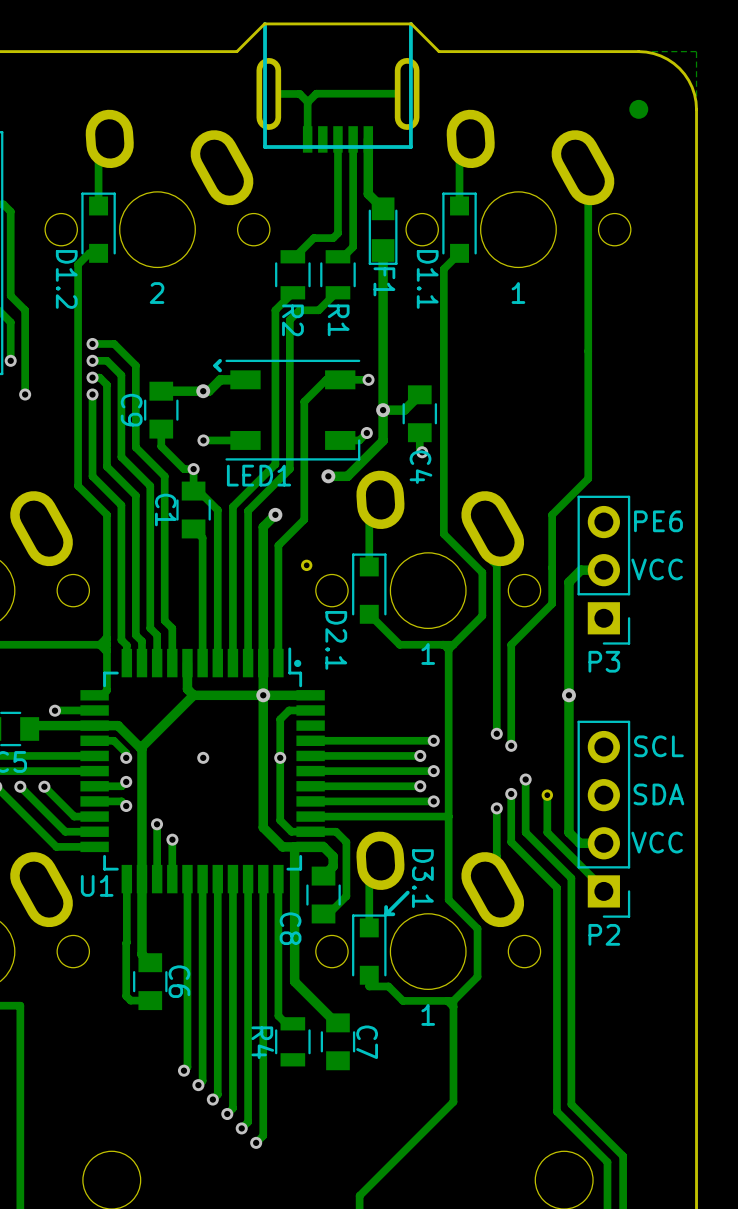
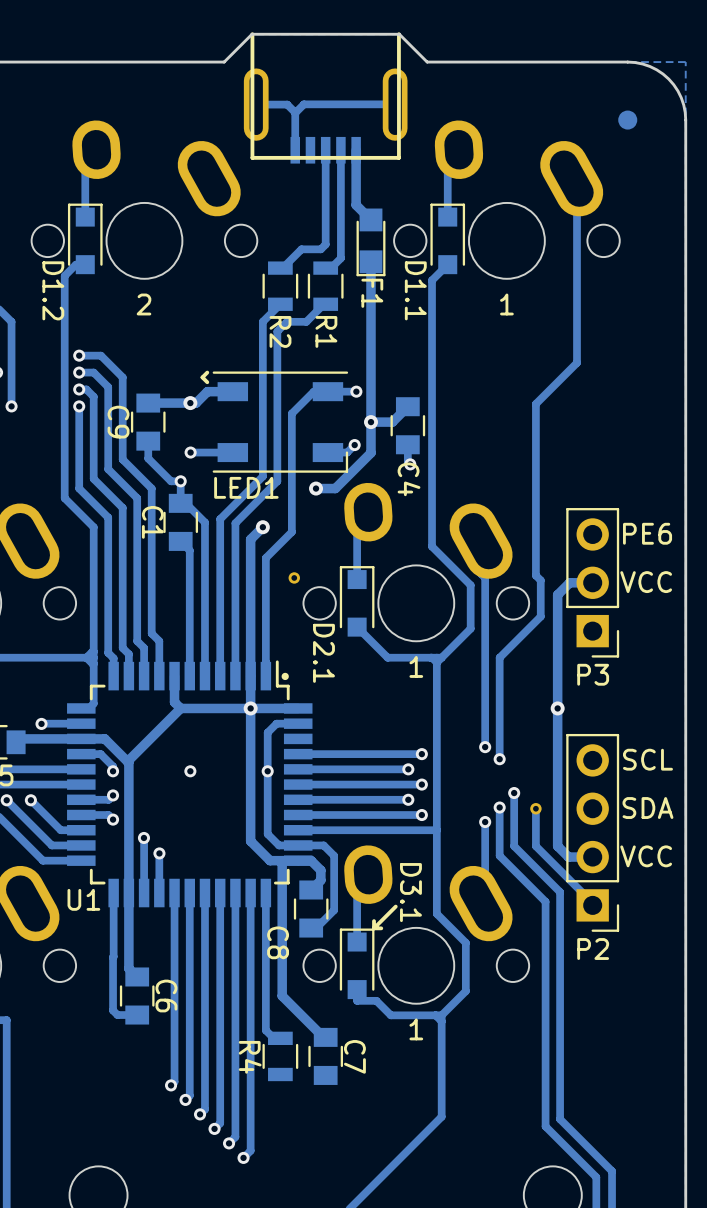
track: (588, 351) (588, 478) (552, 514) (552, 567) -> (576, 362) (535, 403) (535, 575) (540, 580)

